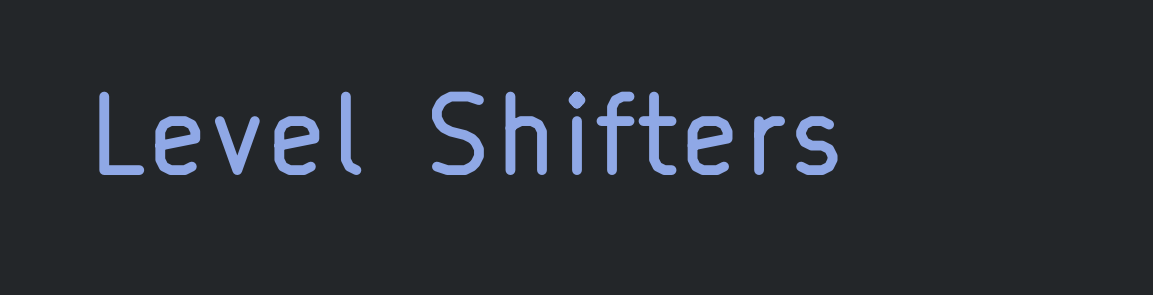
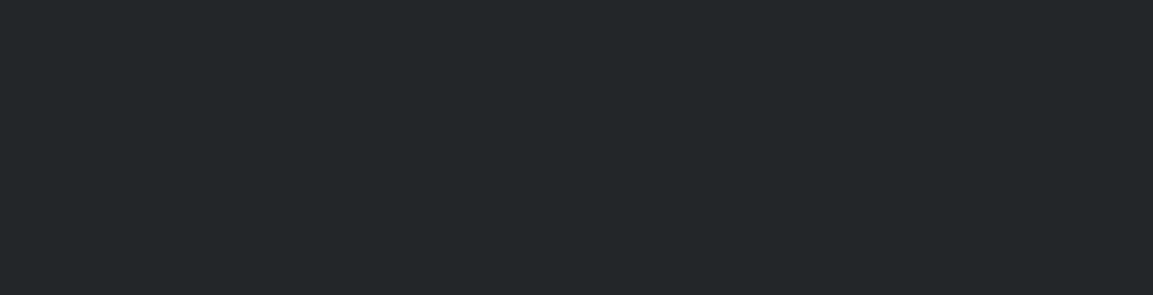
text: Level Shifters (468, 133) -> none

